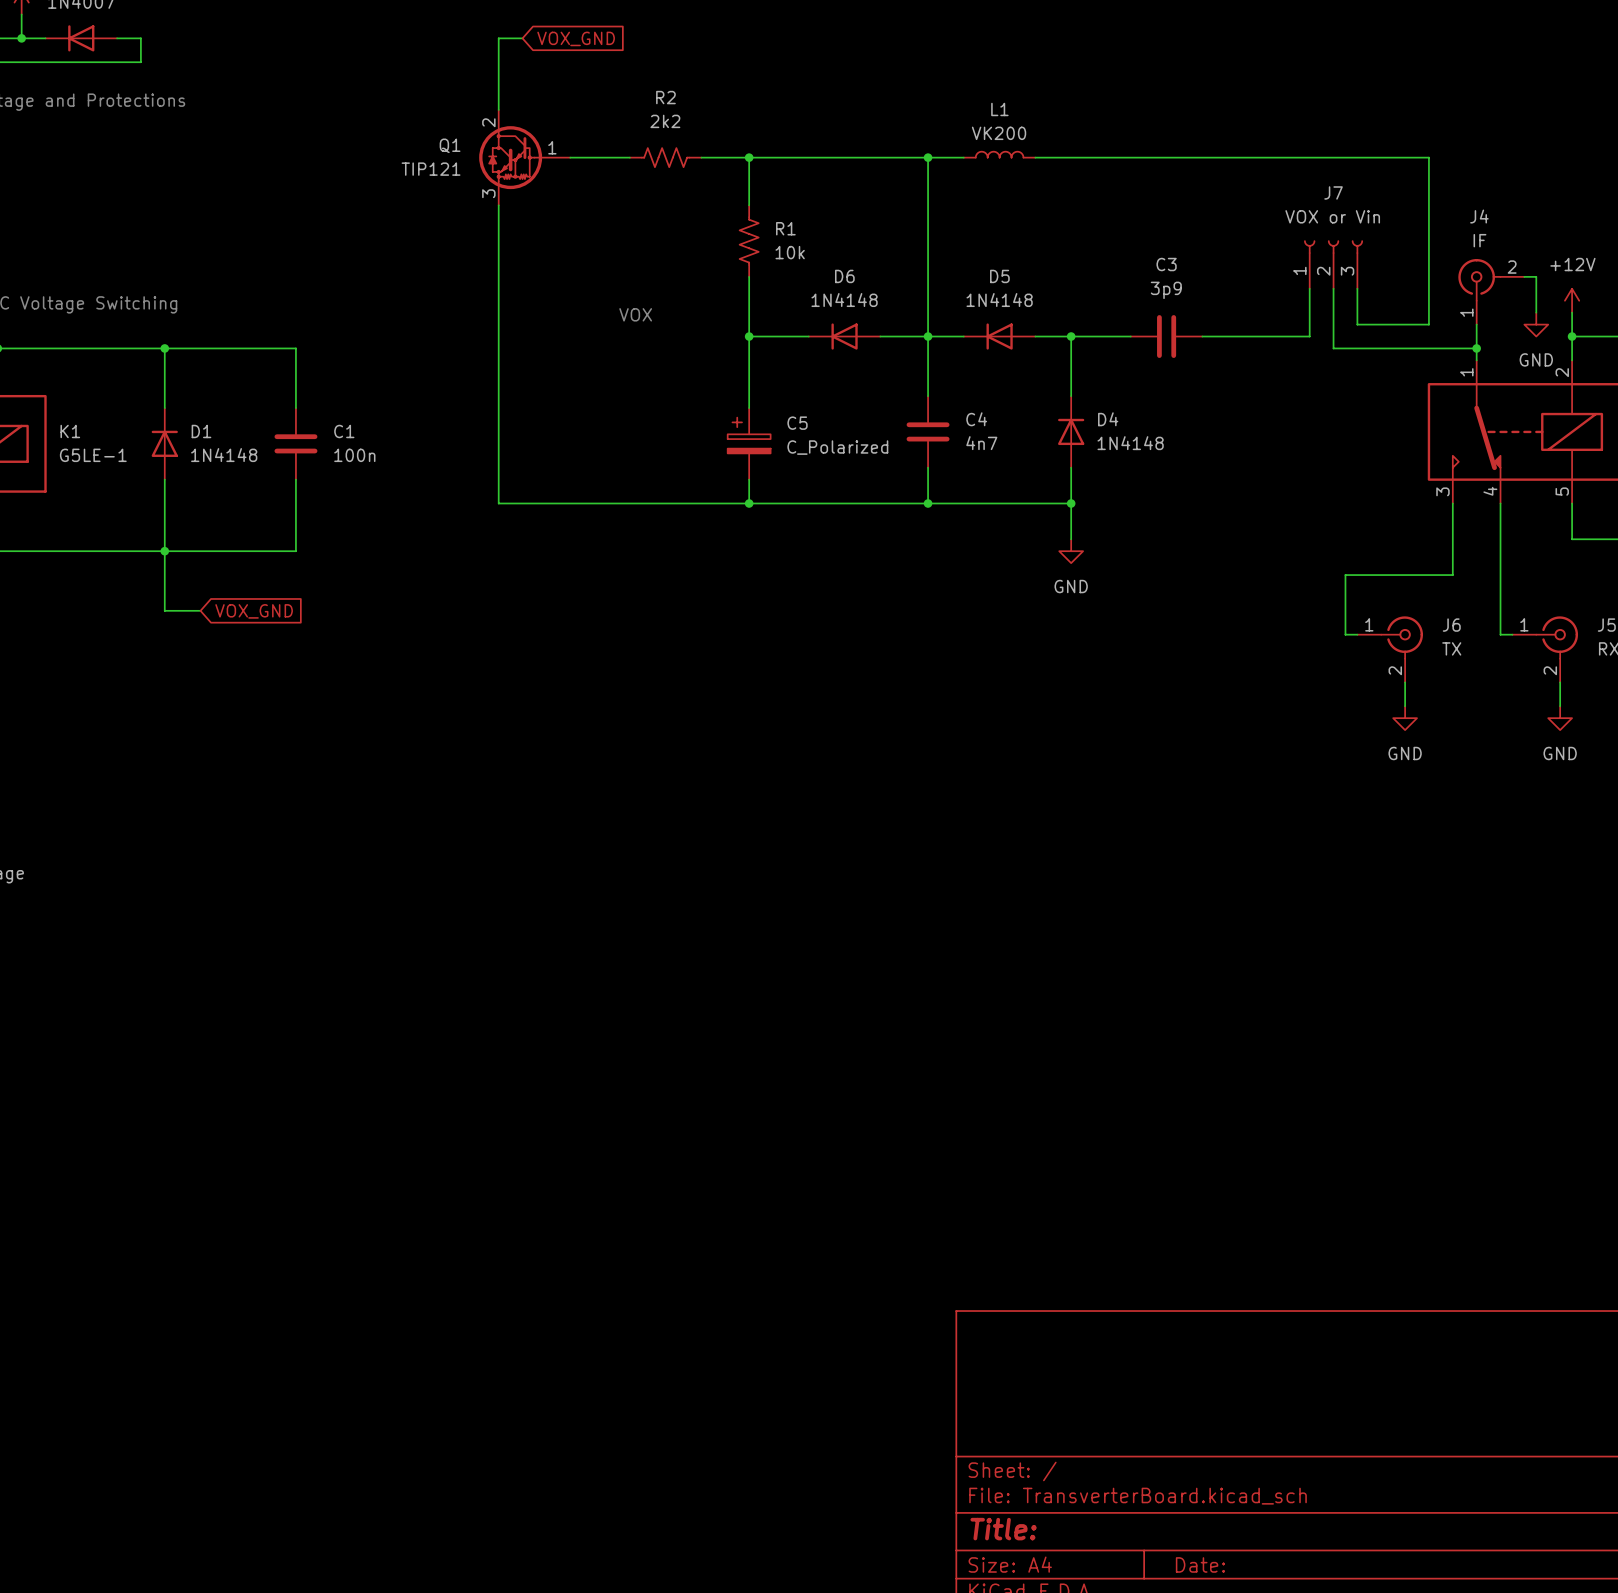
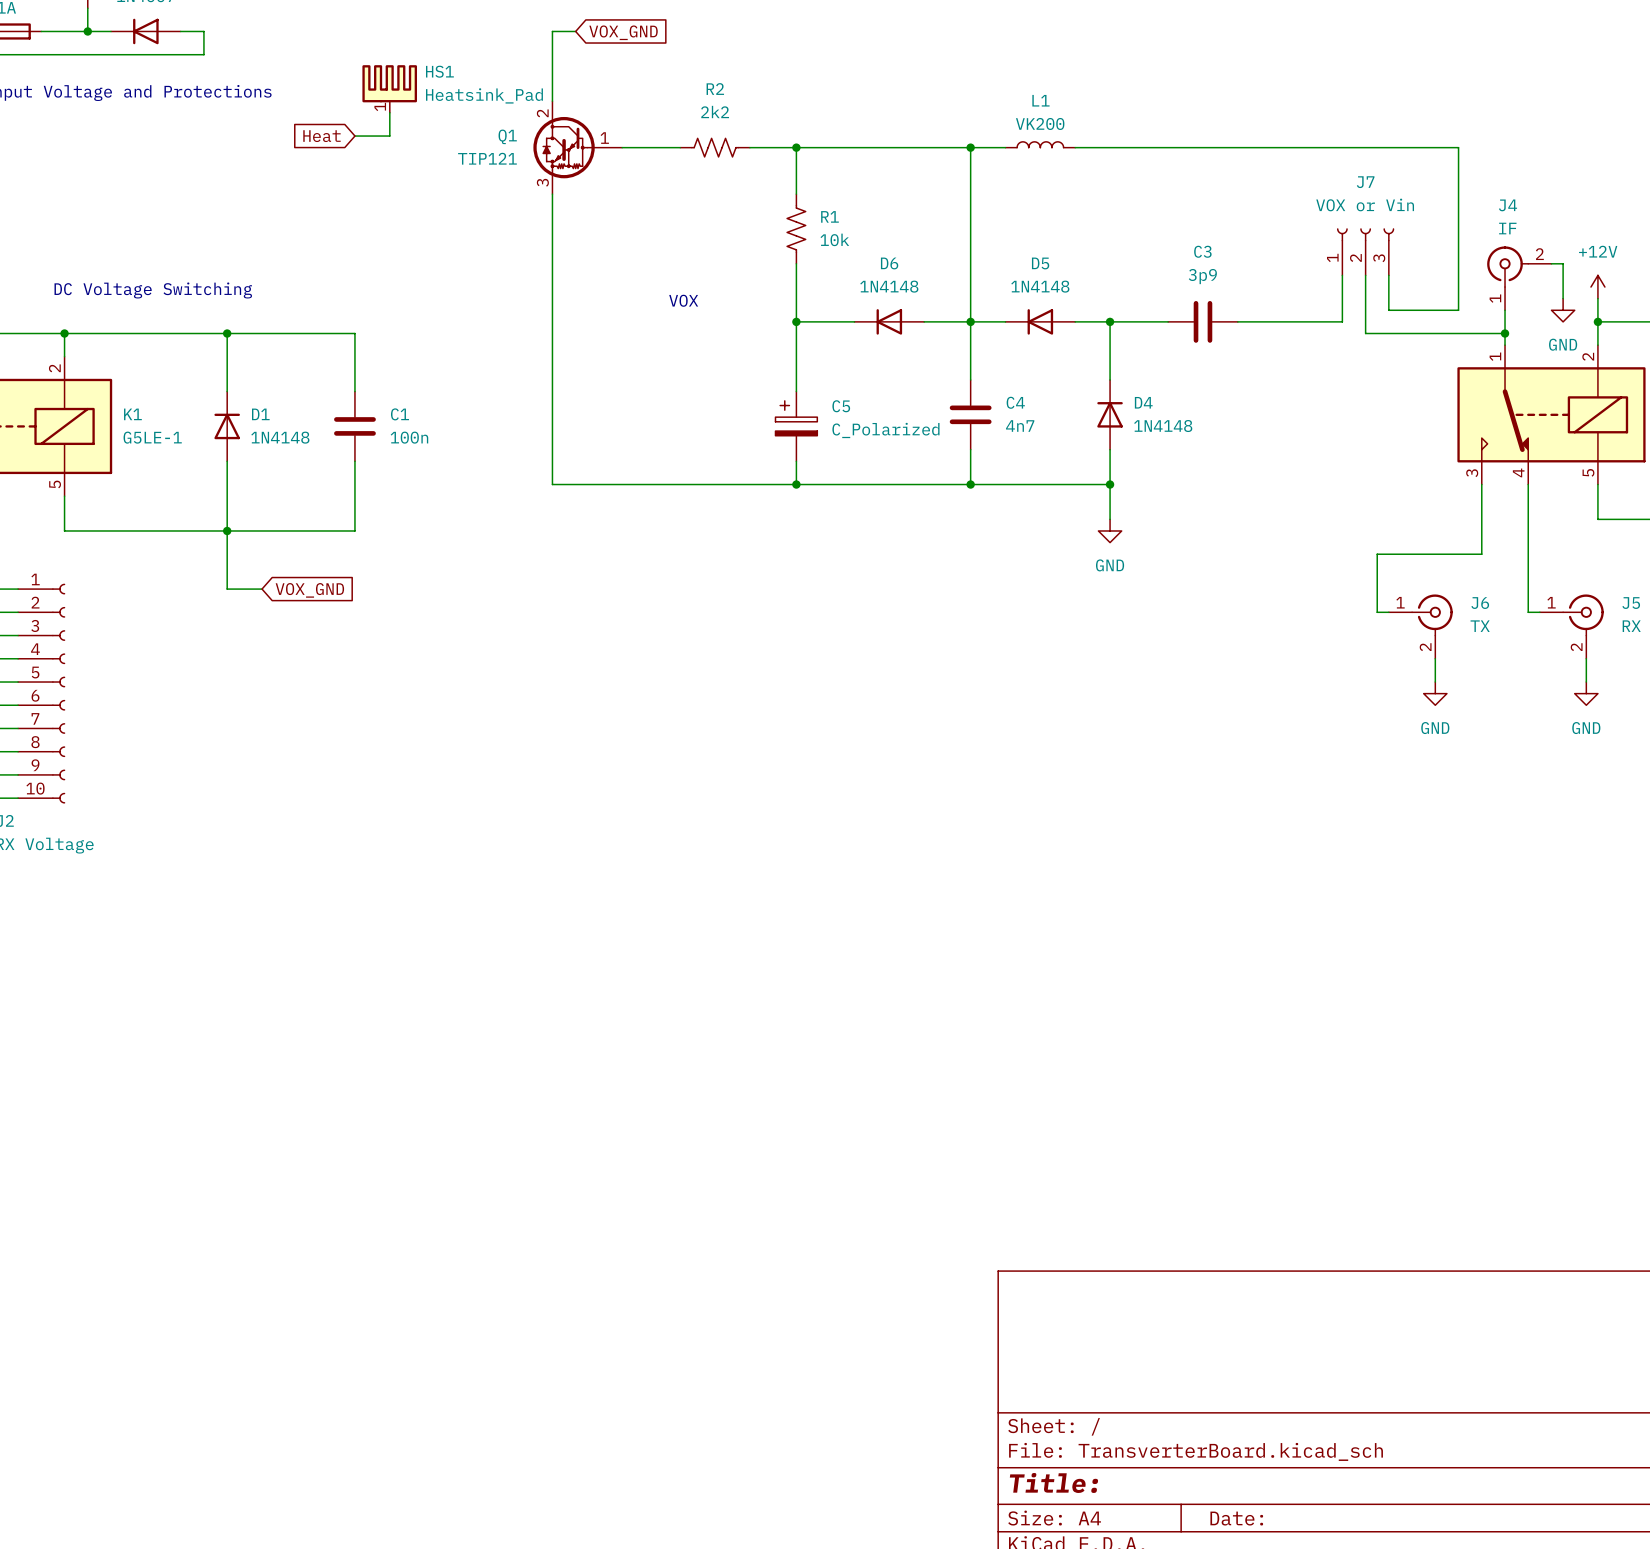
HS1: none -> Heatsink_Pad (389, 88)
wire: none -> (389, 112) (389, 136) (354, 136)
global label: none -> Heat (321, 136)

